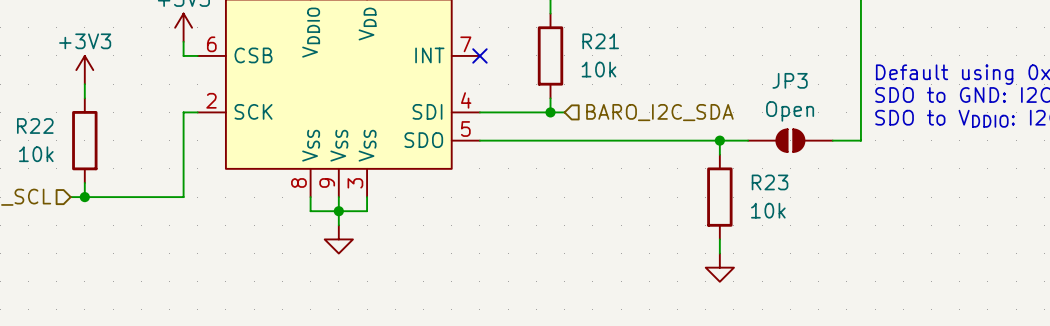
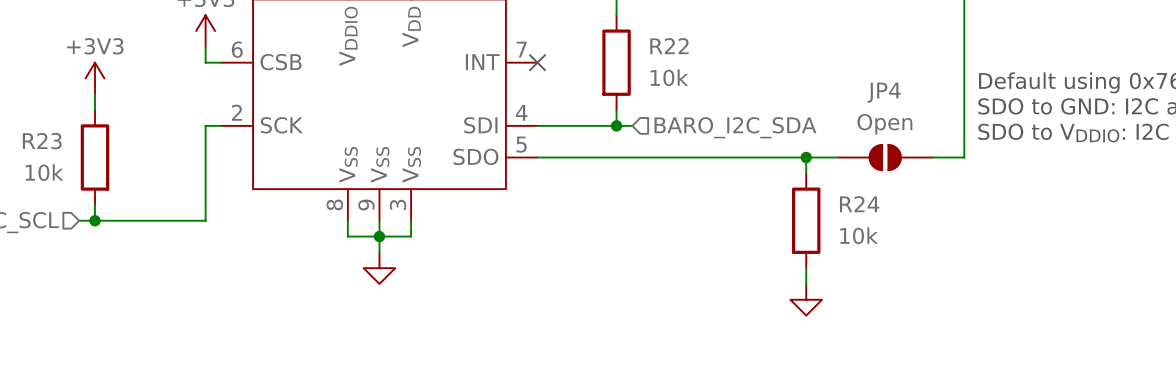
R21 name: R21 (600, 41) -> R22 (669, 46)
JP3 name: JP3 (790, 80) -> JP4 (884, 92)
R22 name: R22 (35, 126) -> R23 (42, 141)
R23 name: R23 (770, 182) -> R24 (859, 204)

